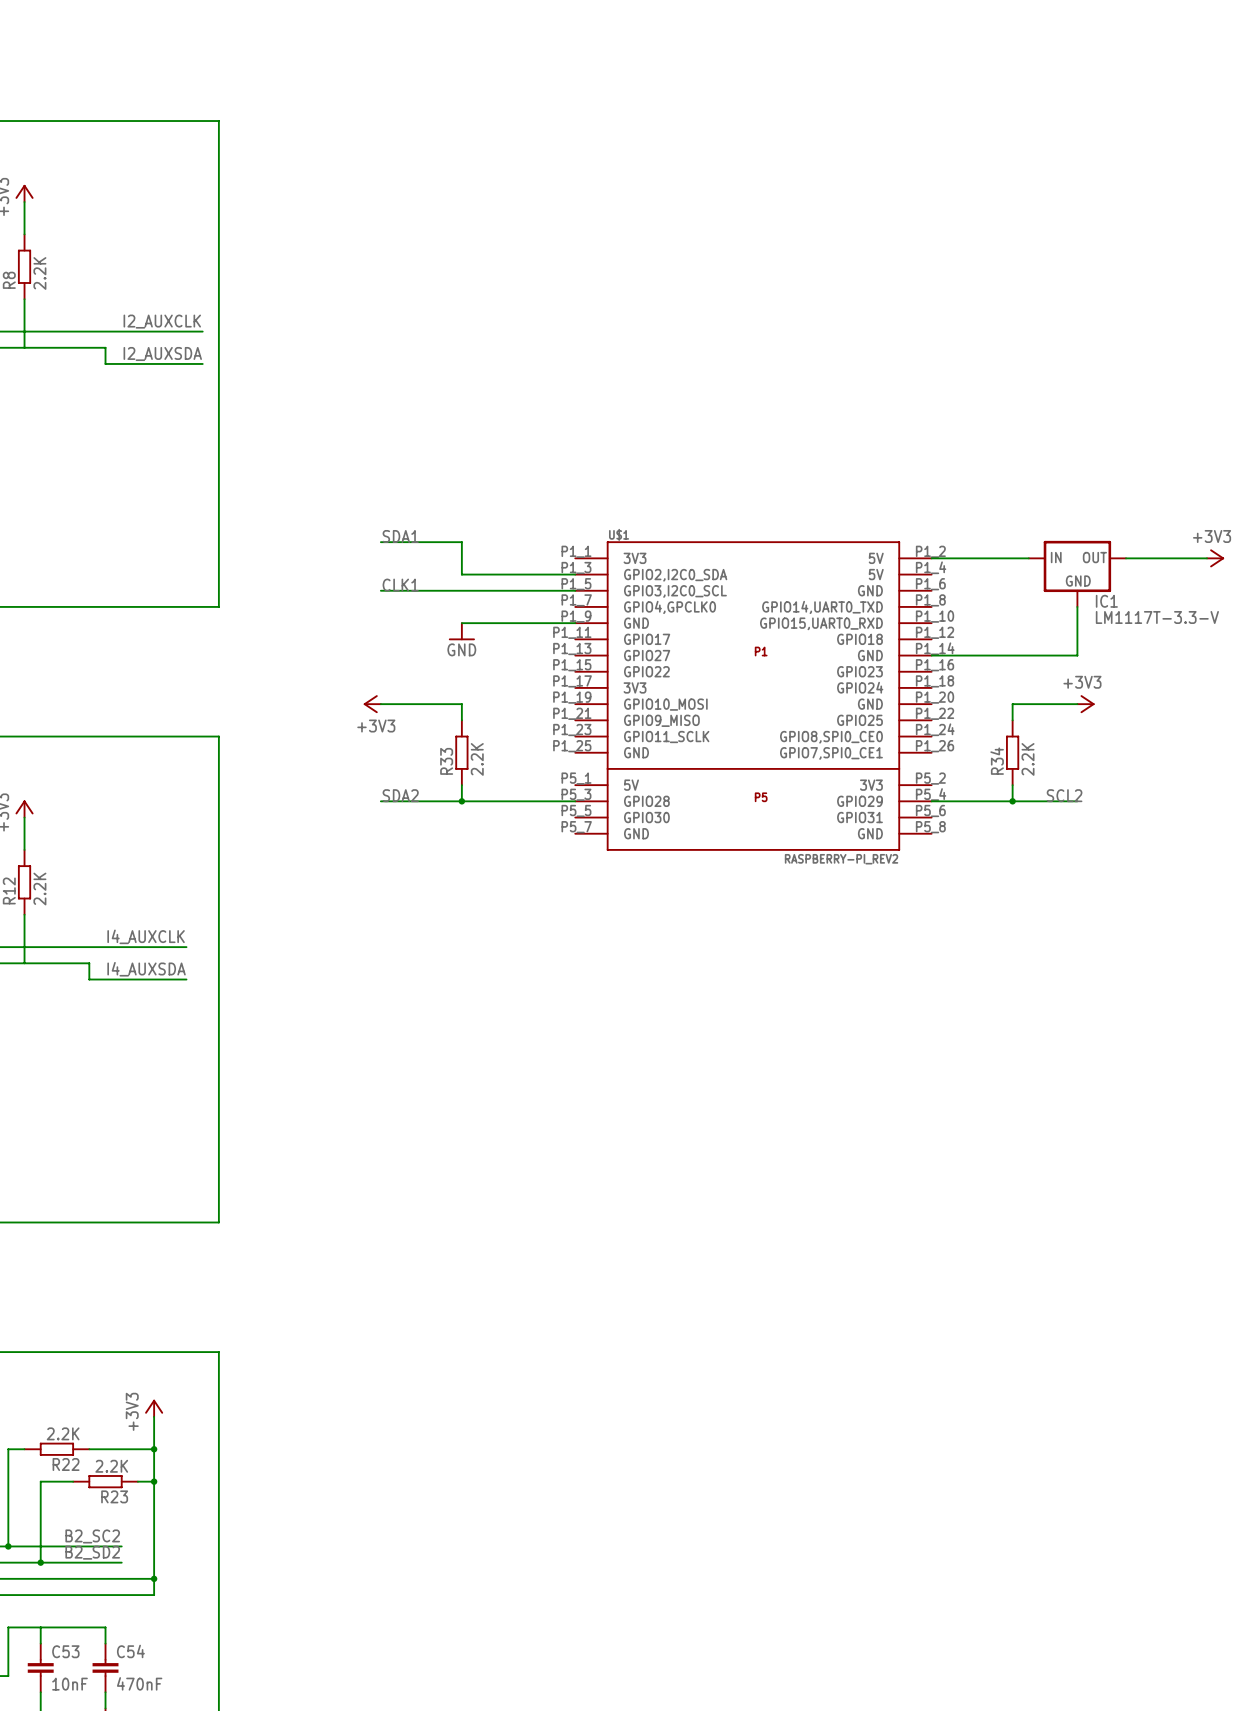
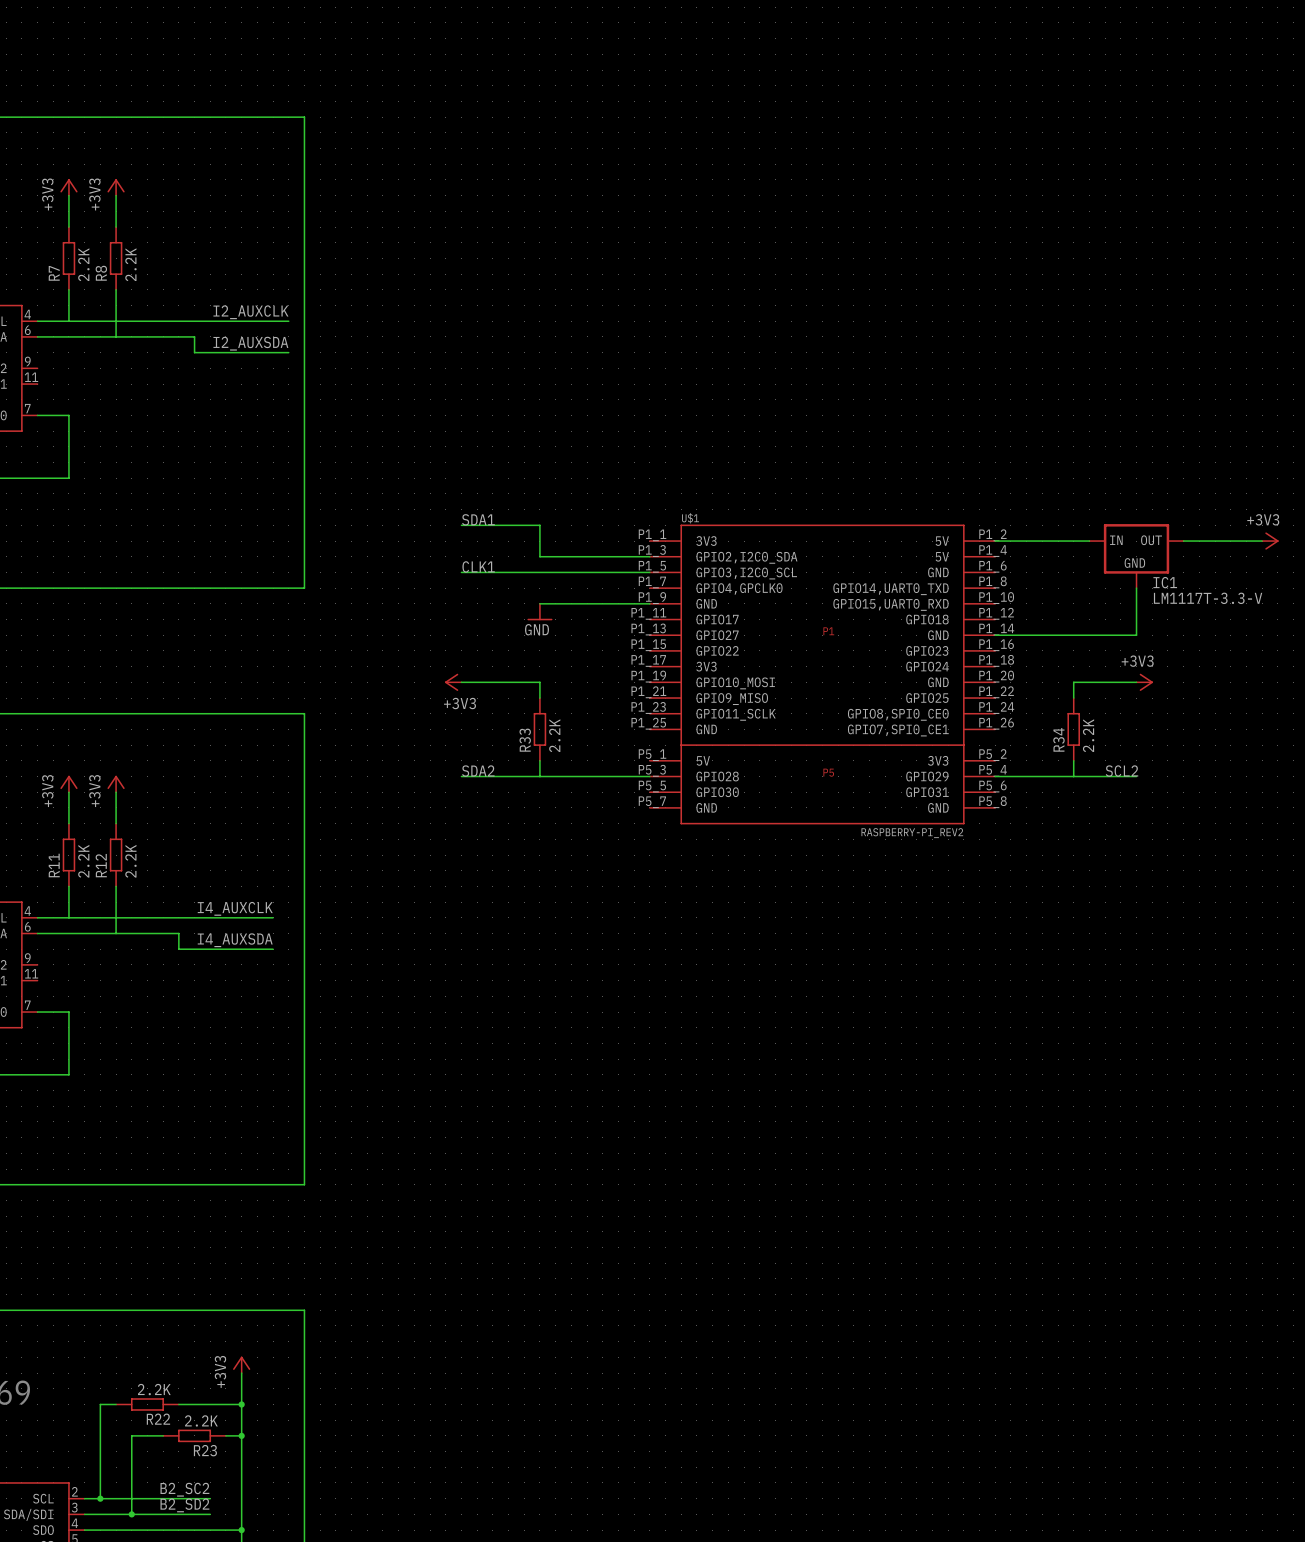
junction: (461, 801) -> none
junction: (1012, 801) -> none

